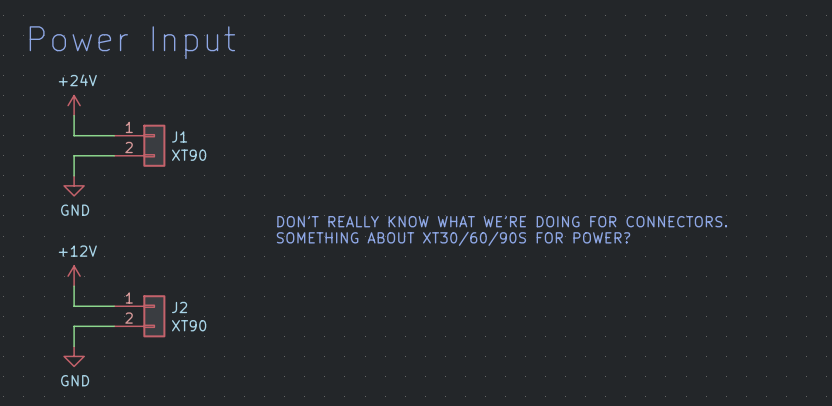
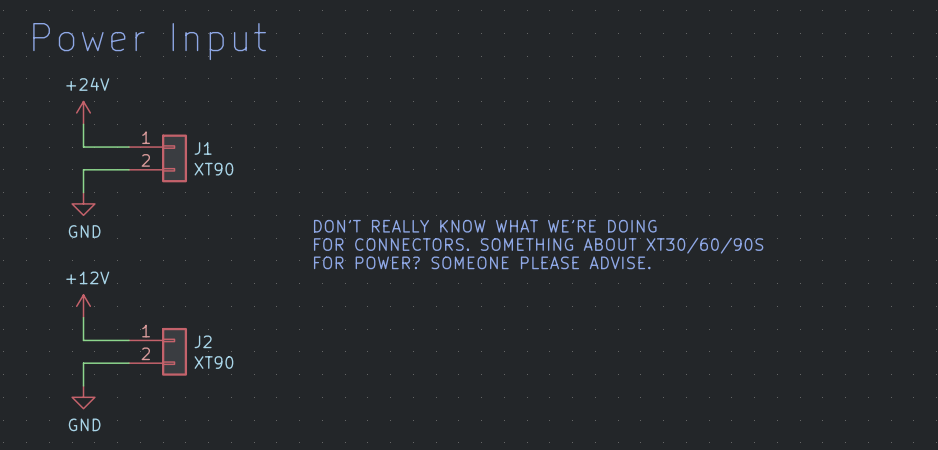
text: none -> DON’T REALLY KNOW WHAT WE’RE DOING (485, 226)
text: DON’T REALLY KNOW WHAT WE’RE DOING FOR CONNECTORS. (502, 221) -> FOR CONNECTORS. SOMETHING ABOUT XT30/60/90S (538, 245)
text: SOMETHING ABOUT XT30/60/90S FOR POWER? (453, 238) -> FOR POWER? SOMEONE PLEASE ADVISE. (482, 262)

